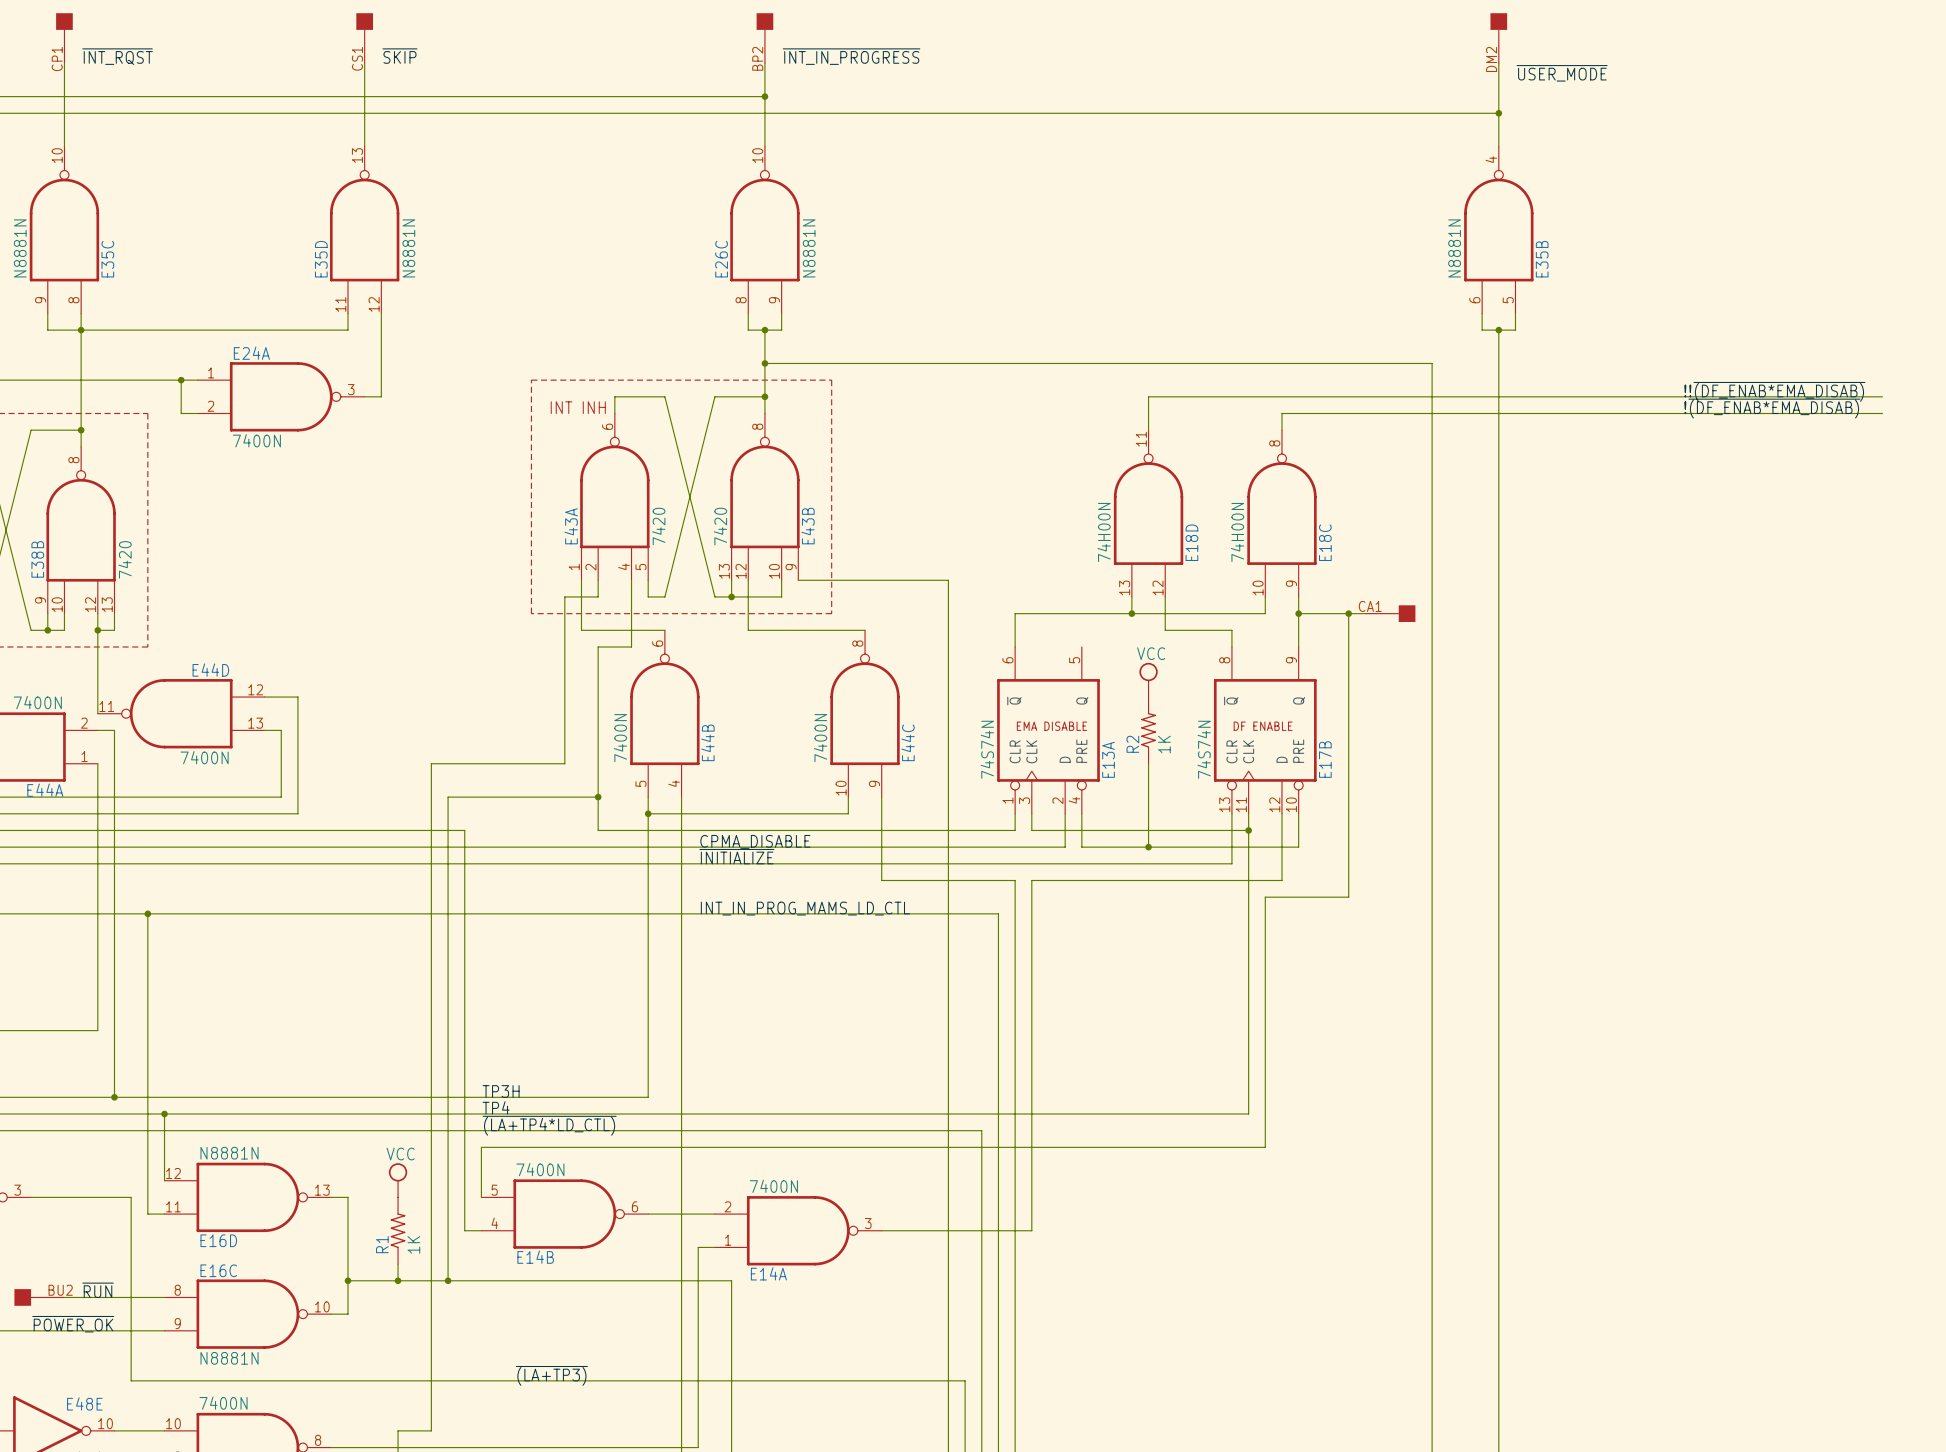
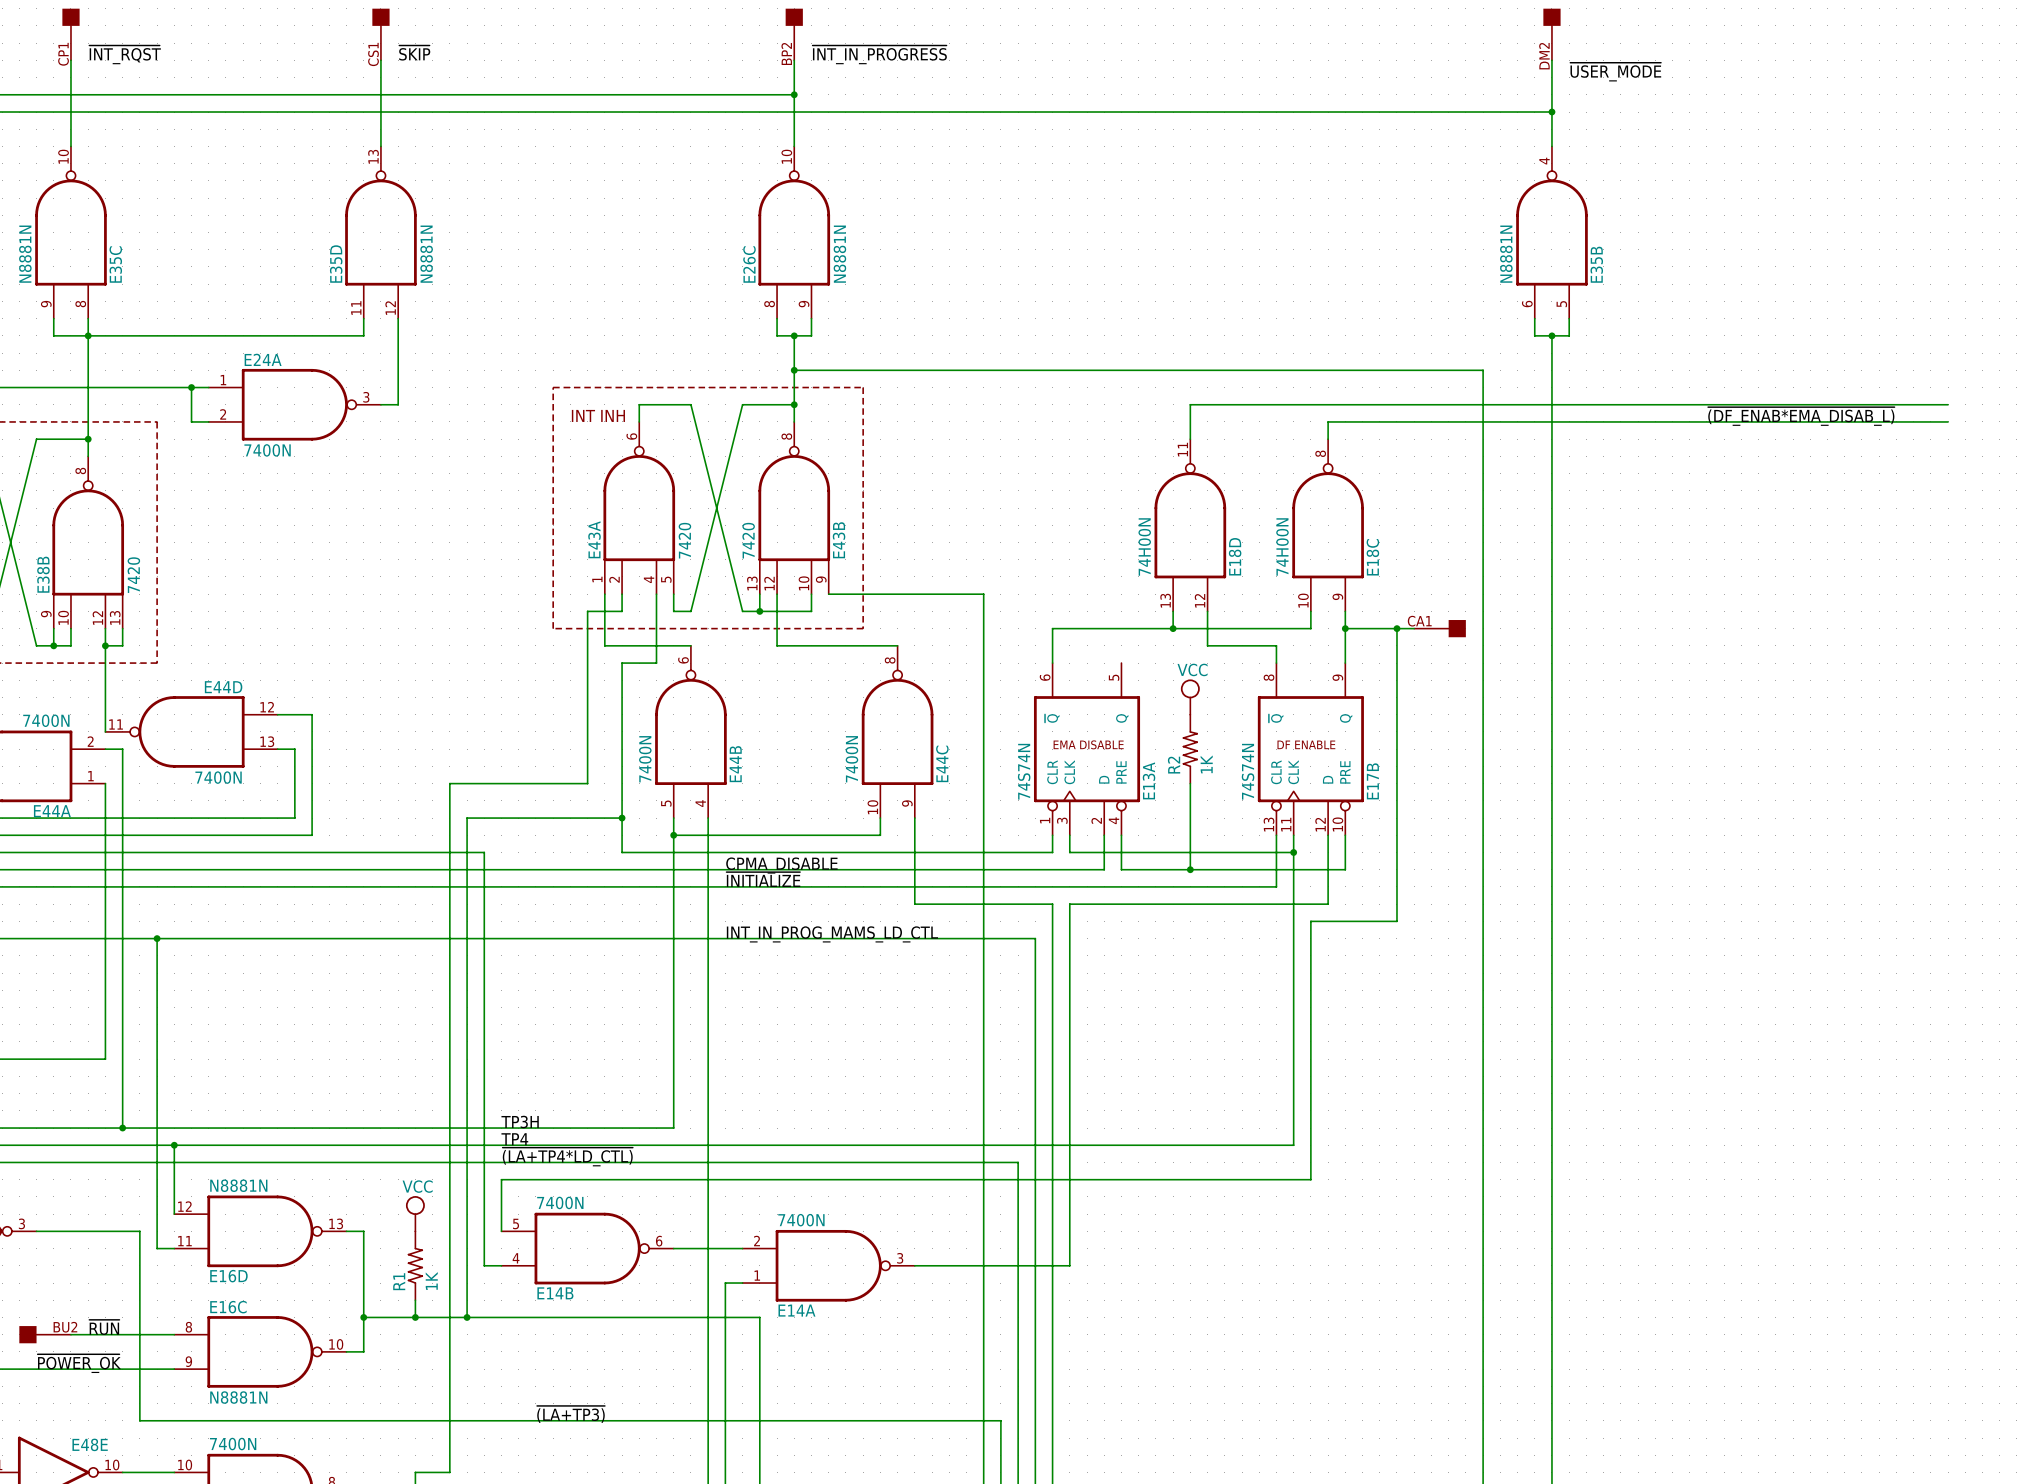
label: !!~{(DF_ENAB*EMA_DISAB)} (1774, 391) -> none
label: none -> ~{(DF_ENAB*EMA_DISAB_L)} (1801, 416)
label: !~{(DF_ENAB*EMA_DISAB)} (1772, 408) -> none

